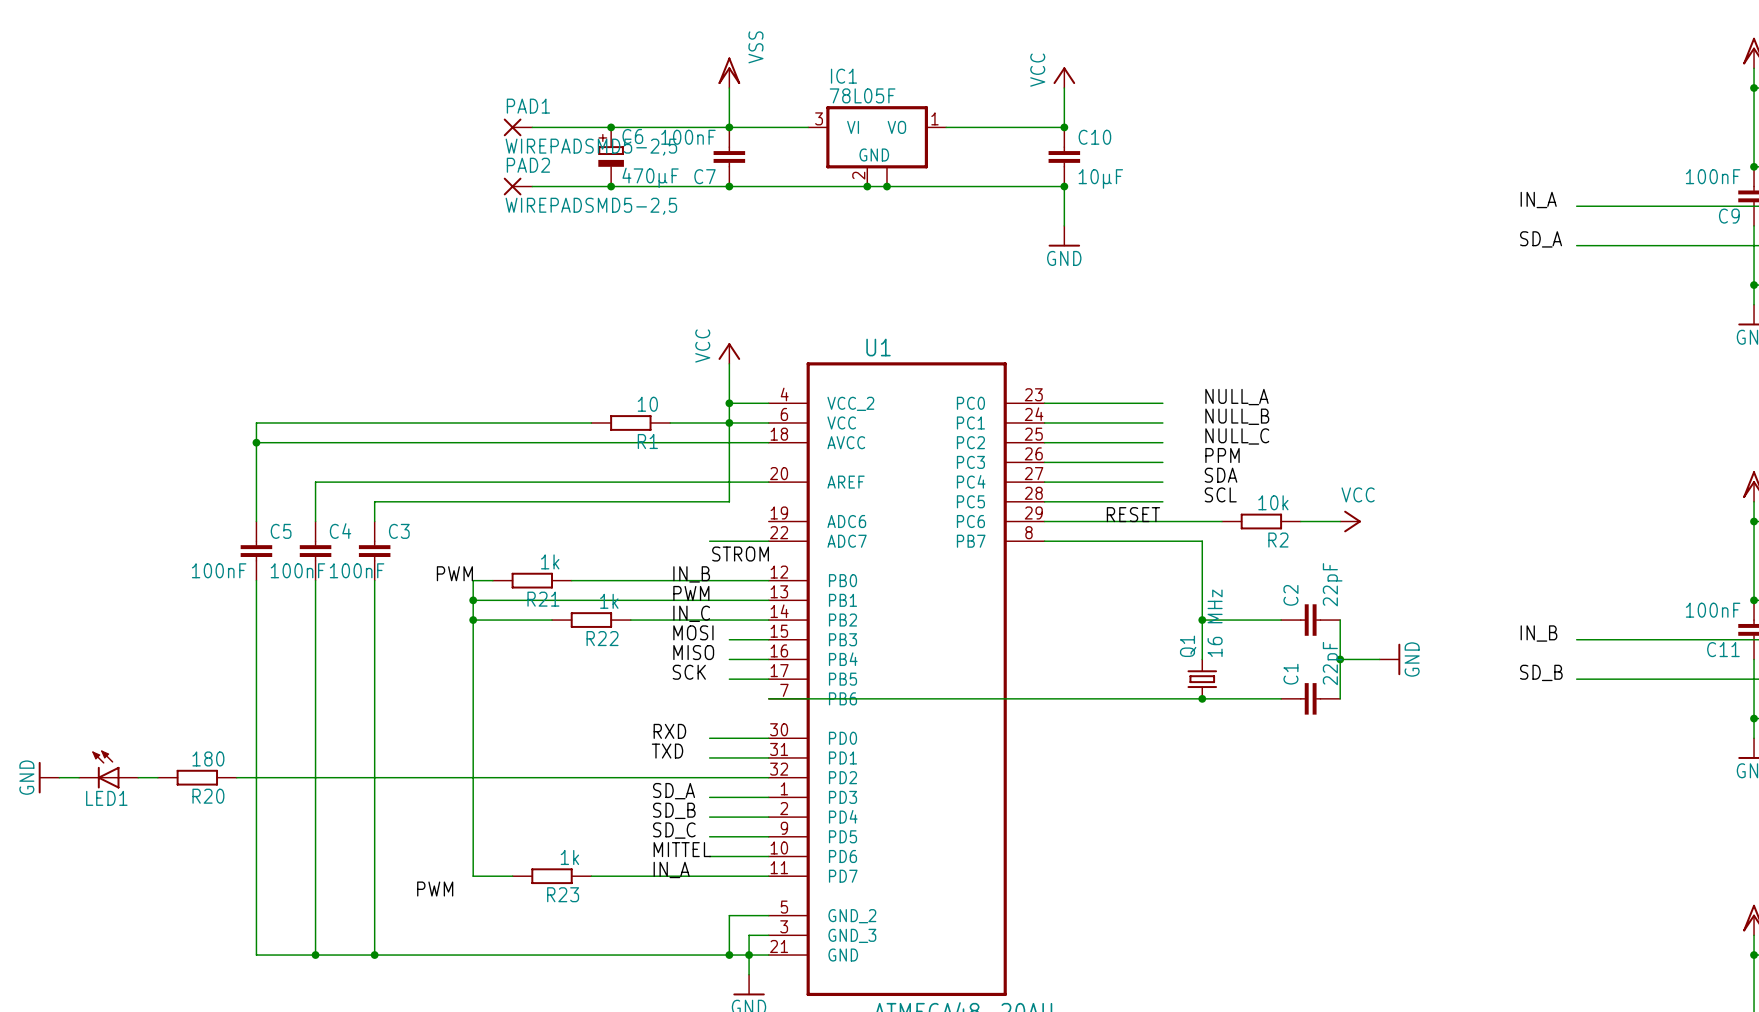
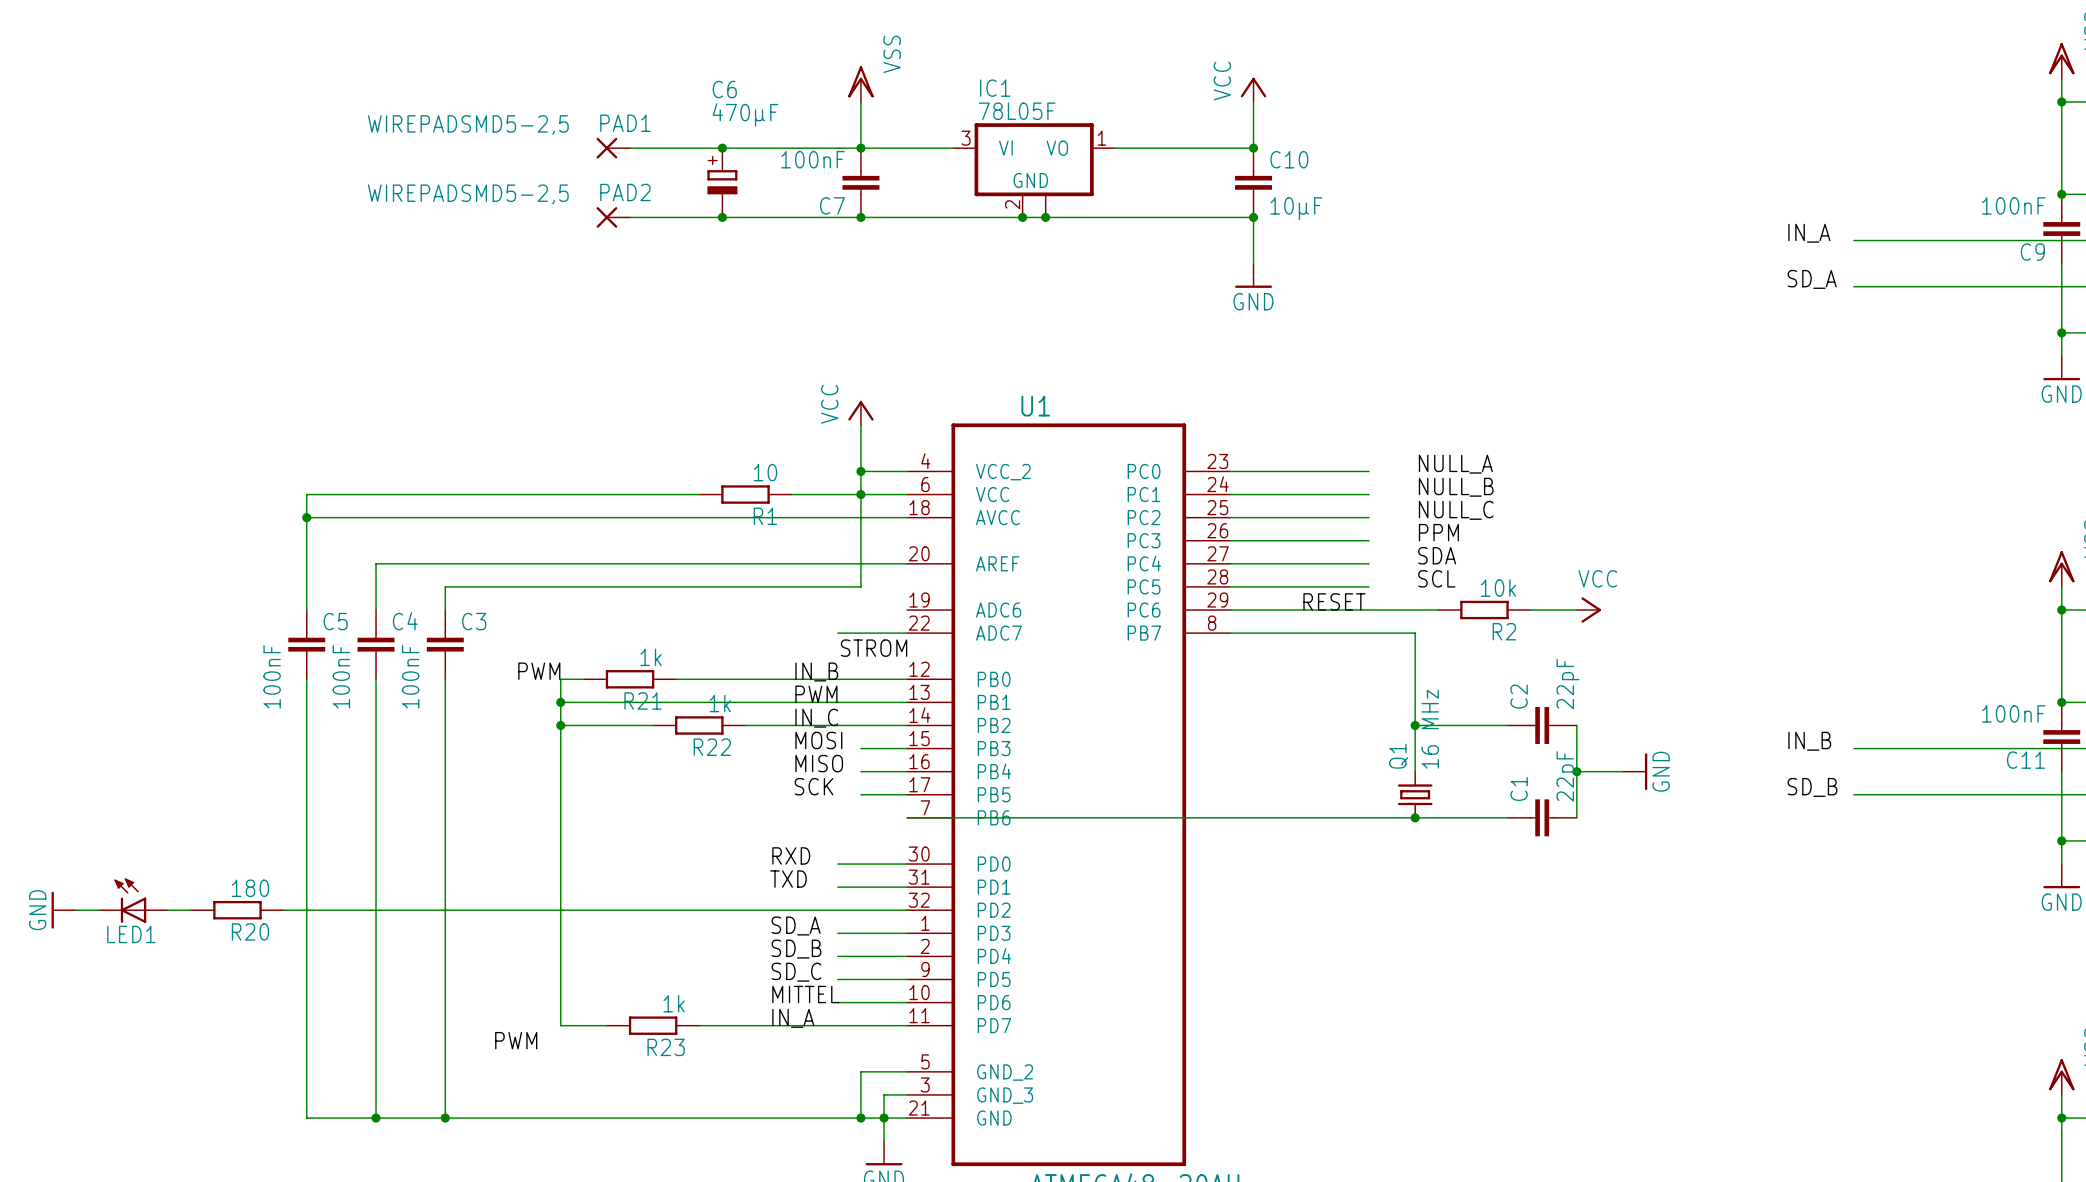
C6 name position: C6 (632, 136) -> C6 (724, 89)
PAD1 value position: WIREPADSMD5-2,5 (591, 147) -> WIREPADSMD5-2,5 (468, 125)
C6 value position: 470µF (650, 177) -> 470µF (745, 114)
PAD2 value position: WIREPADSMD5-2,5 (591, 206) -> WIREPADSMD5-2,5 (468, 194)
C5 value rotation: 0° (219, 570) -> 90° counterclockwise (272, 676)
C4 value rotation: 0° (297, 570) -> 90° counterclockwise (341, 676)
C3 value rotation: 0° (357, 570) -> 90° counterclockwise (410, 676)

